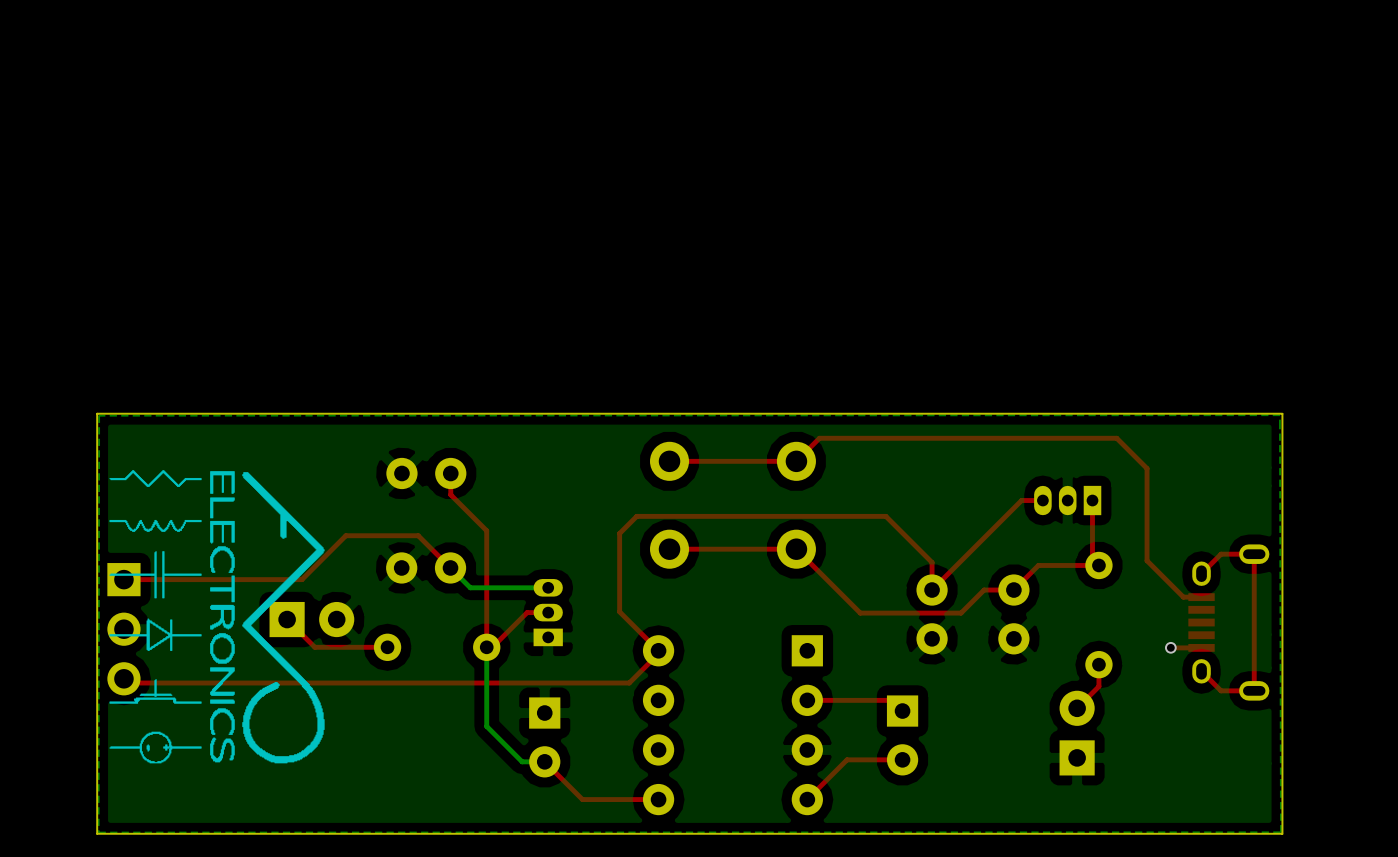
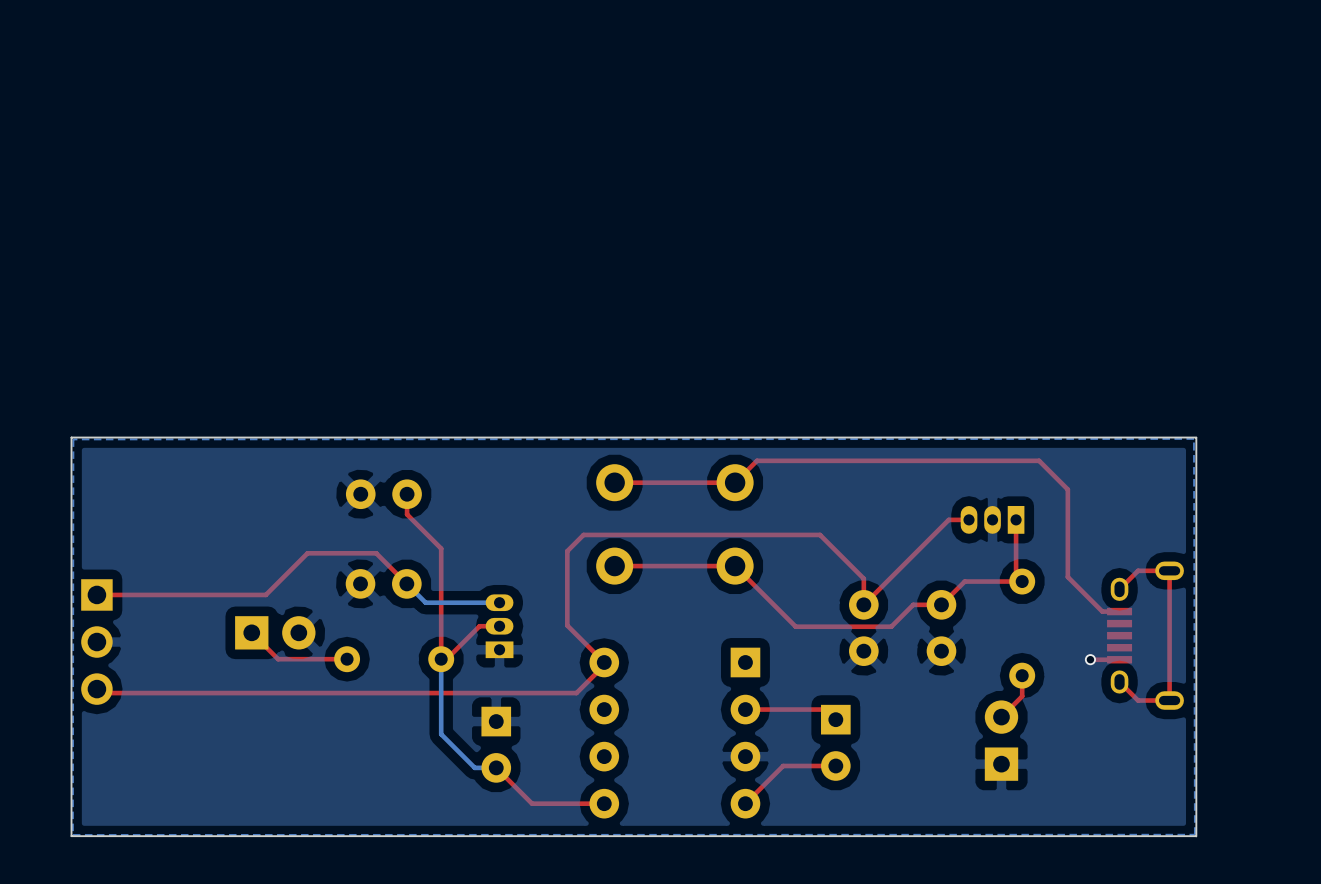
drawing: [109, 470, 325, 764] -> none

